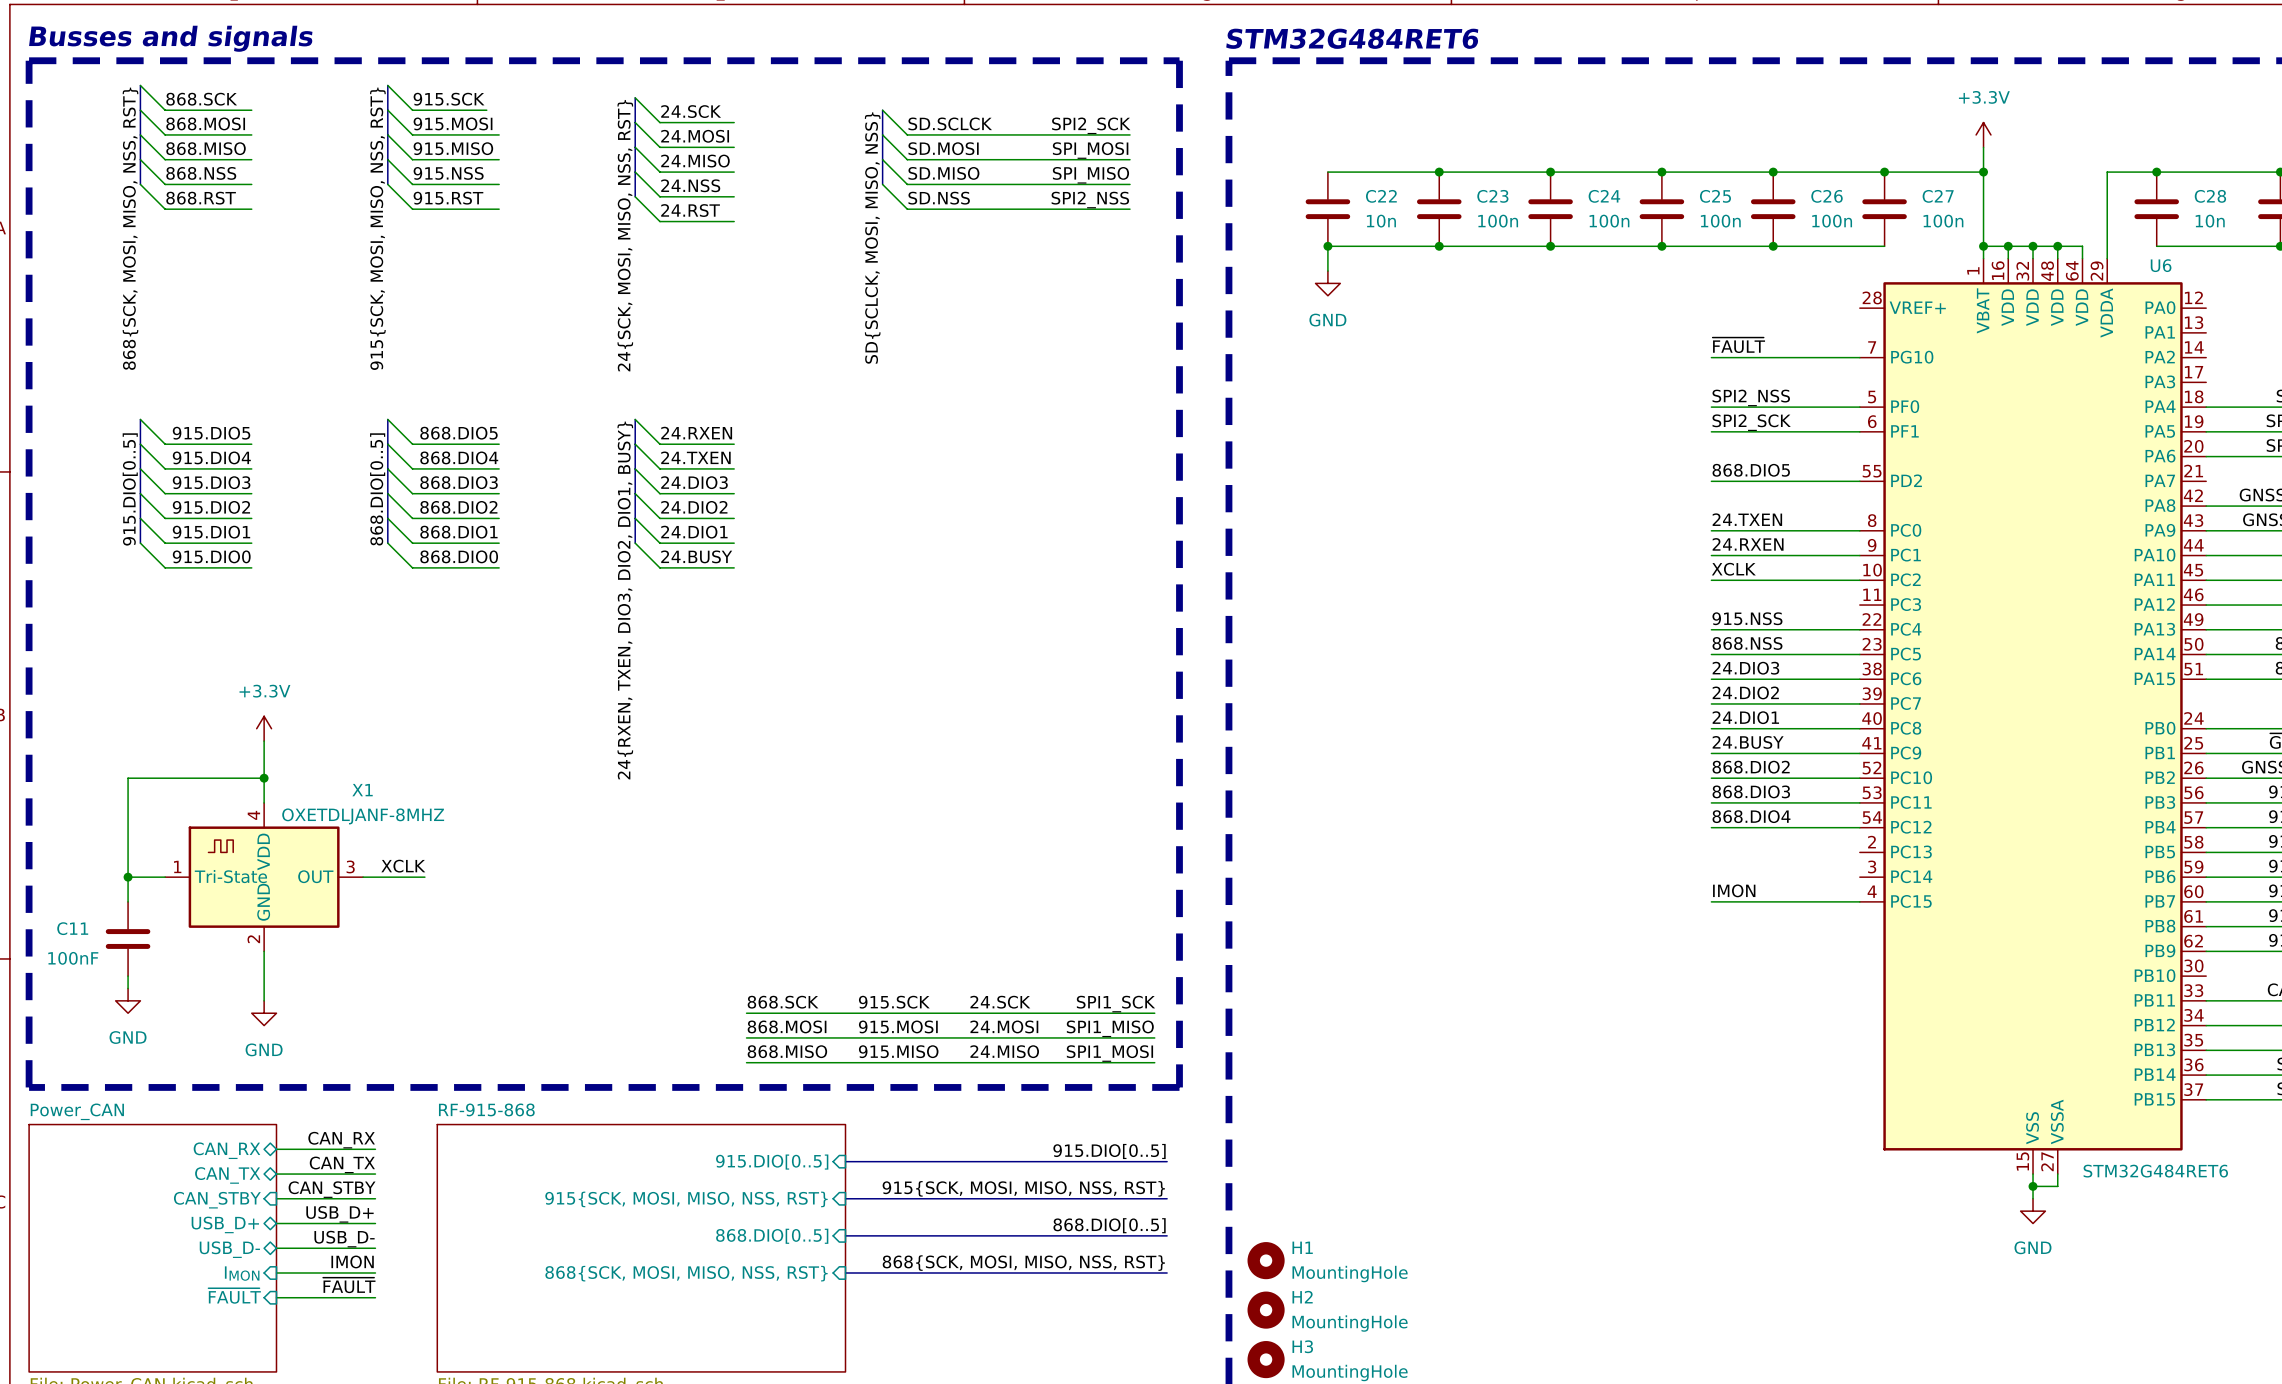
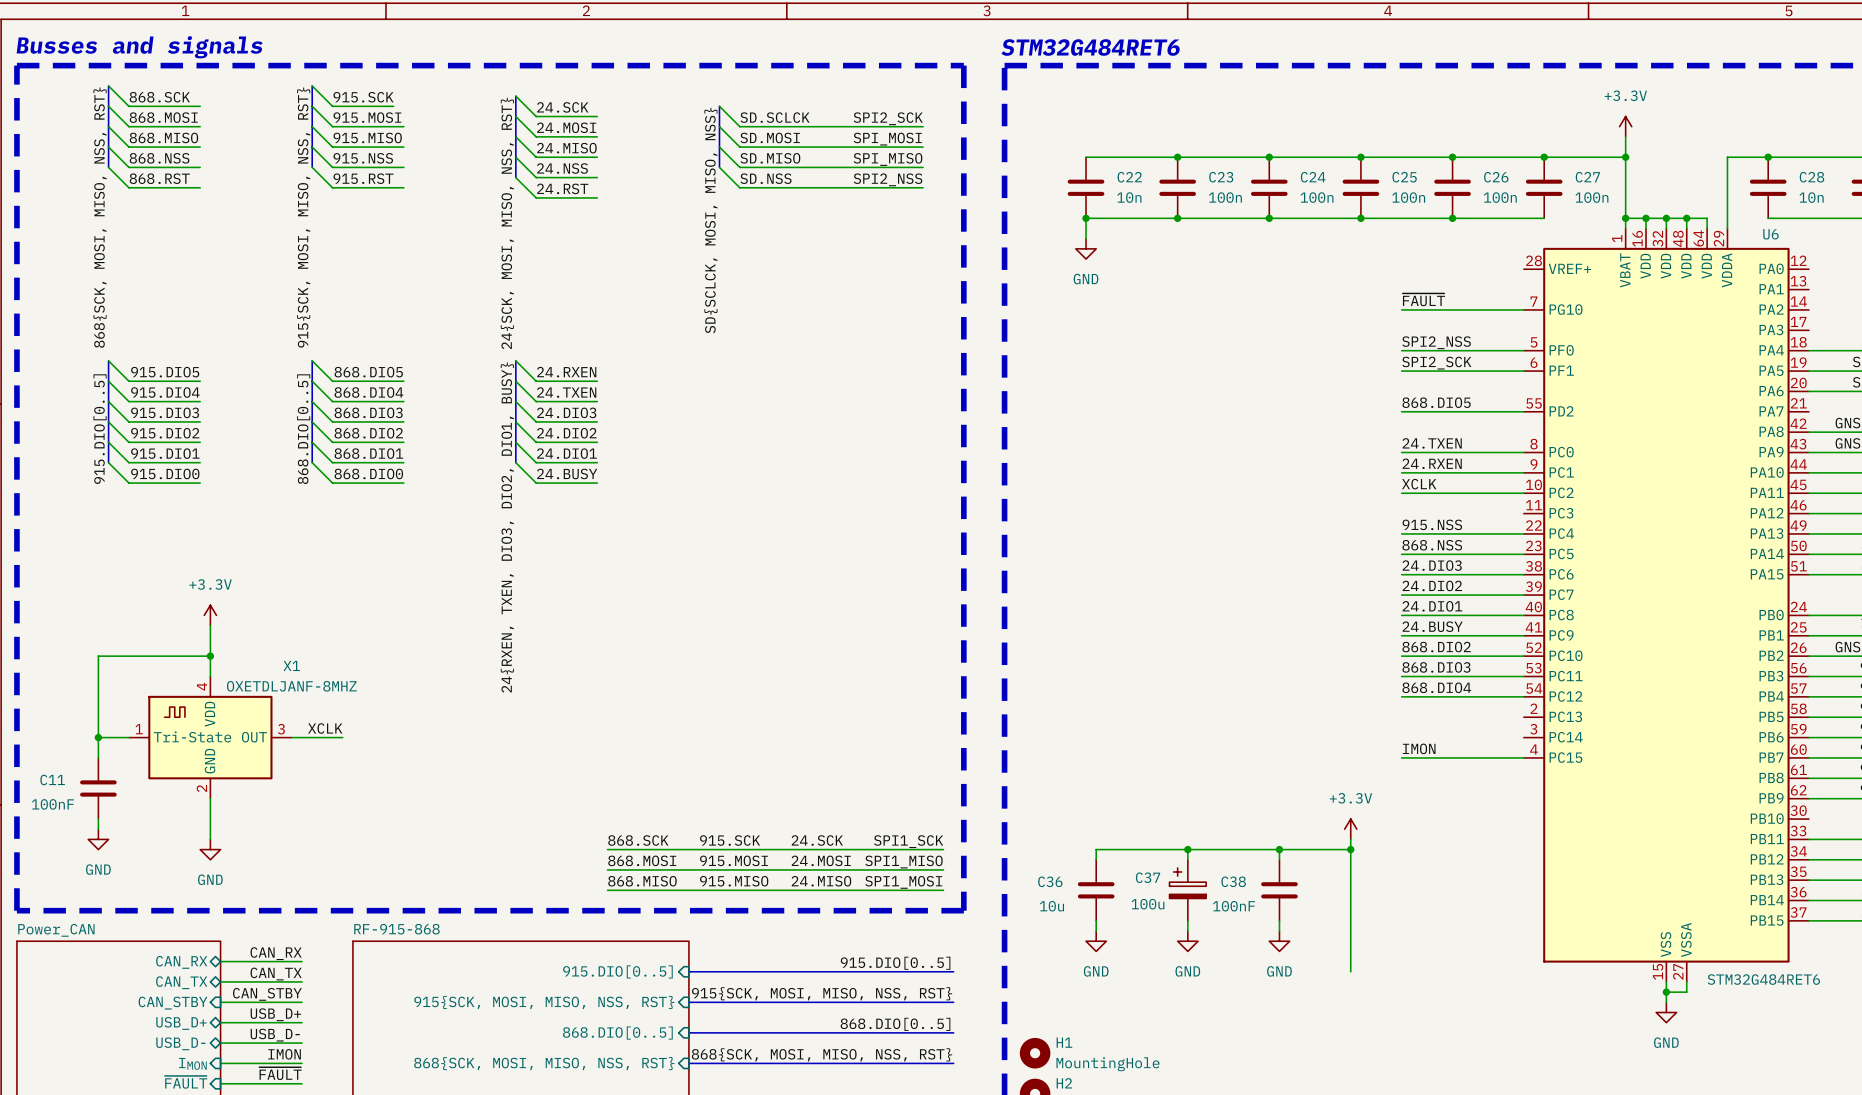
power symbol: none -> +3.3V (1350, 829)
wire: none -> (1350, 839) (1350, 971)
wire: none -> (1187, 849) (1187, 859)
junction: none -> (1187, 849)
wire: none -> (1279, 849) (1279, 859)
junction: none -> (1279, 849)
wire: none -> (1350, 849) (1096, 849) (1096, 859)
junction: none -> (1350, 849)
C36: none -> 10u (1096, 890)
C37: none -> 100u (1187, 890)
C38: none -> 100nF (1279, 890)
wire: none -> (1096, 920) (1096, 931)
wire: none -> (1187, 920) (1187, 931)
wire: none -> (1279, 920) (1279, 931)
power symbol: none -> GND (1096, 941)
power symbol: none -> GND (1187, 941)
power symbol: none -> GND (1279, 941)

